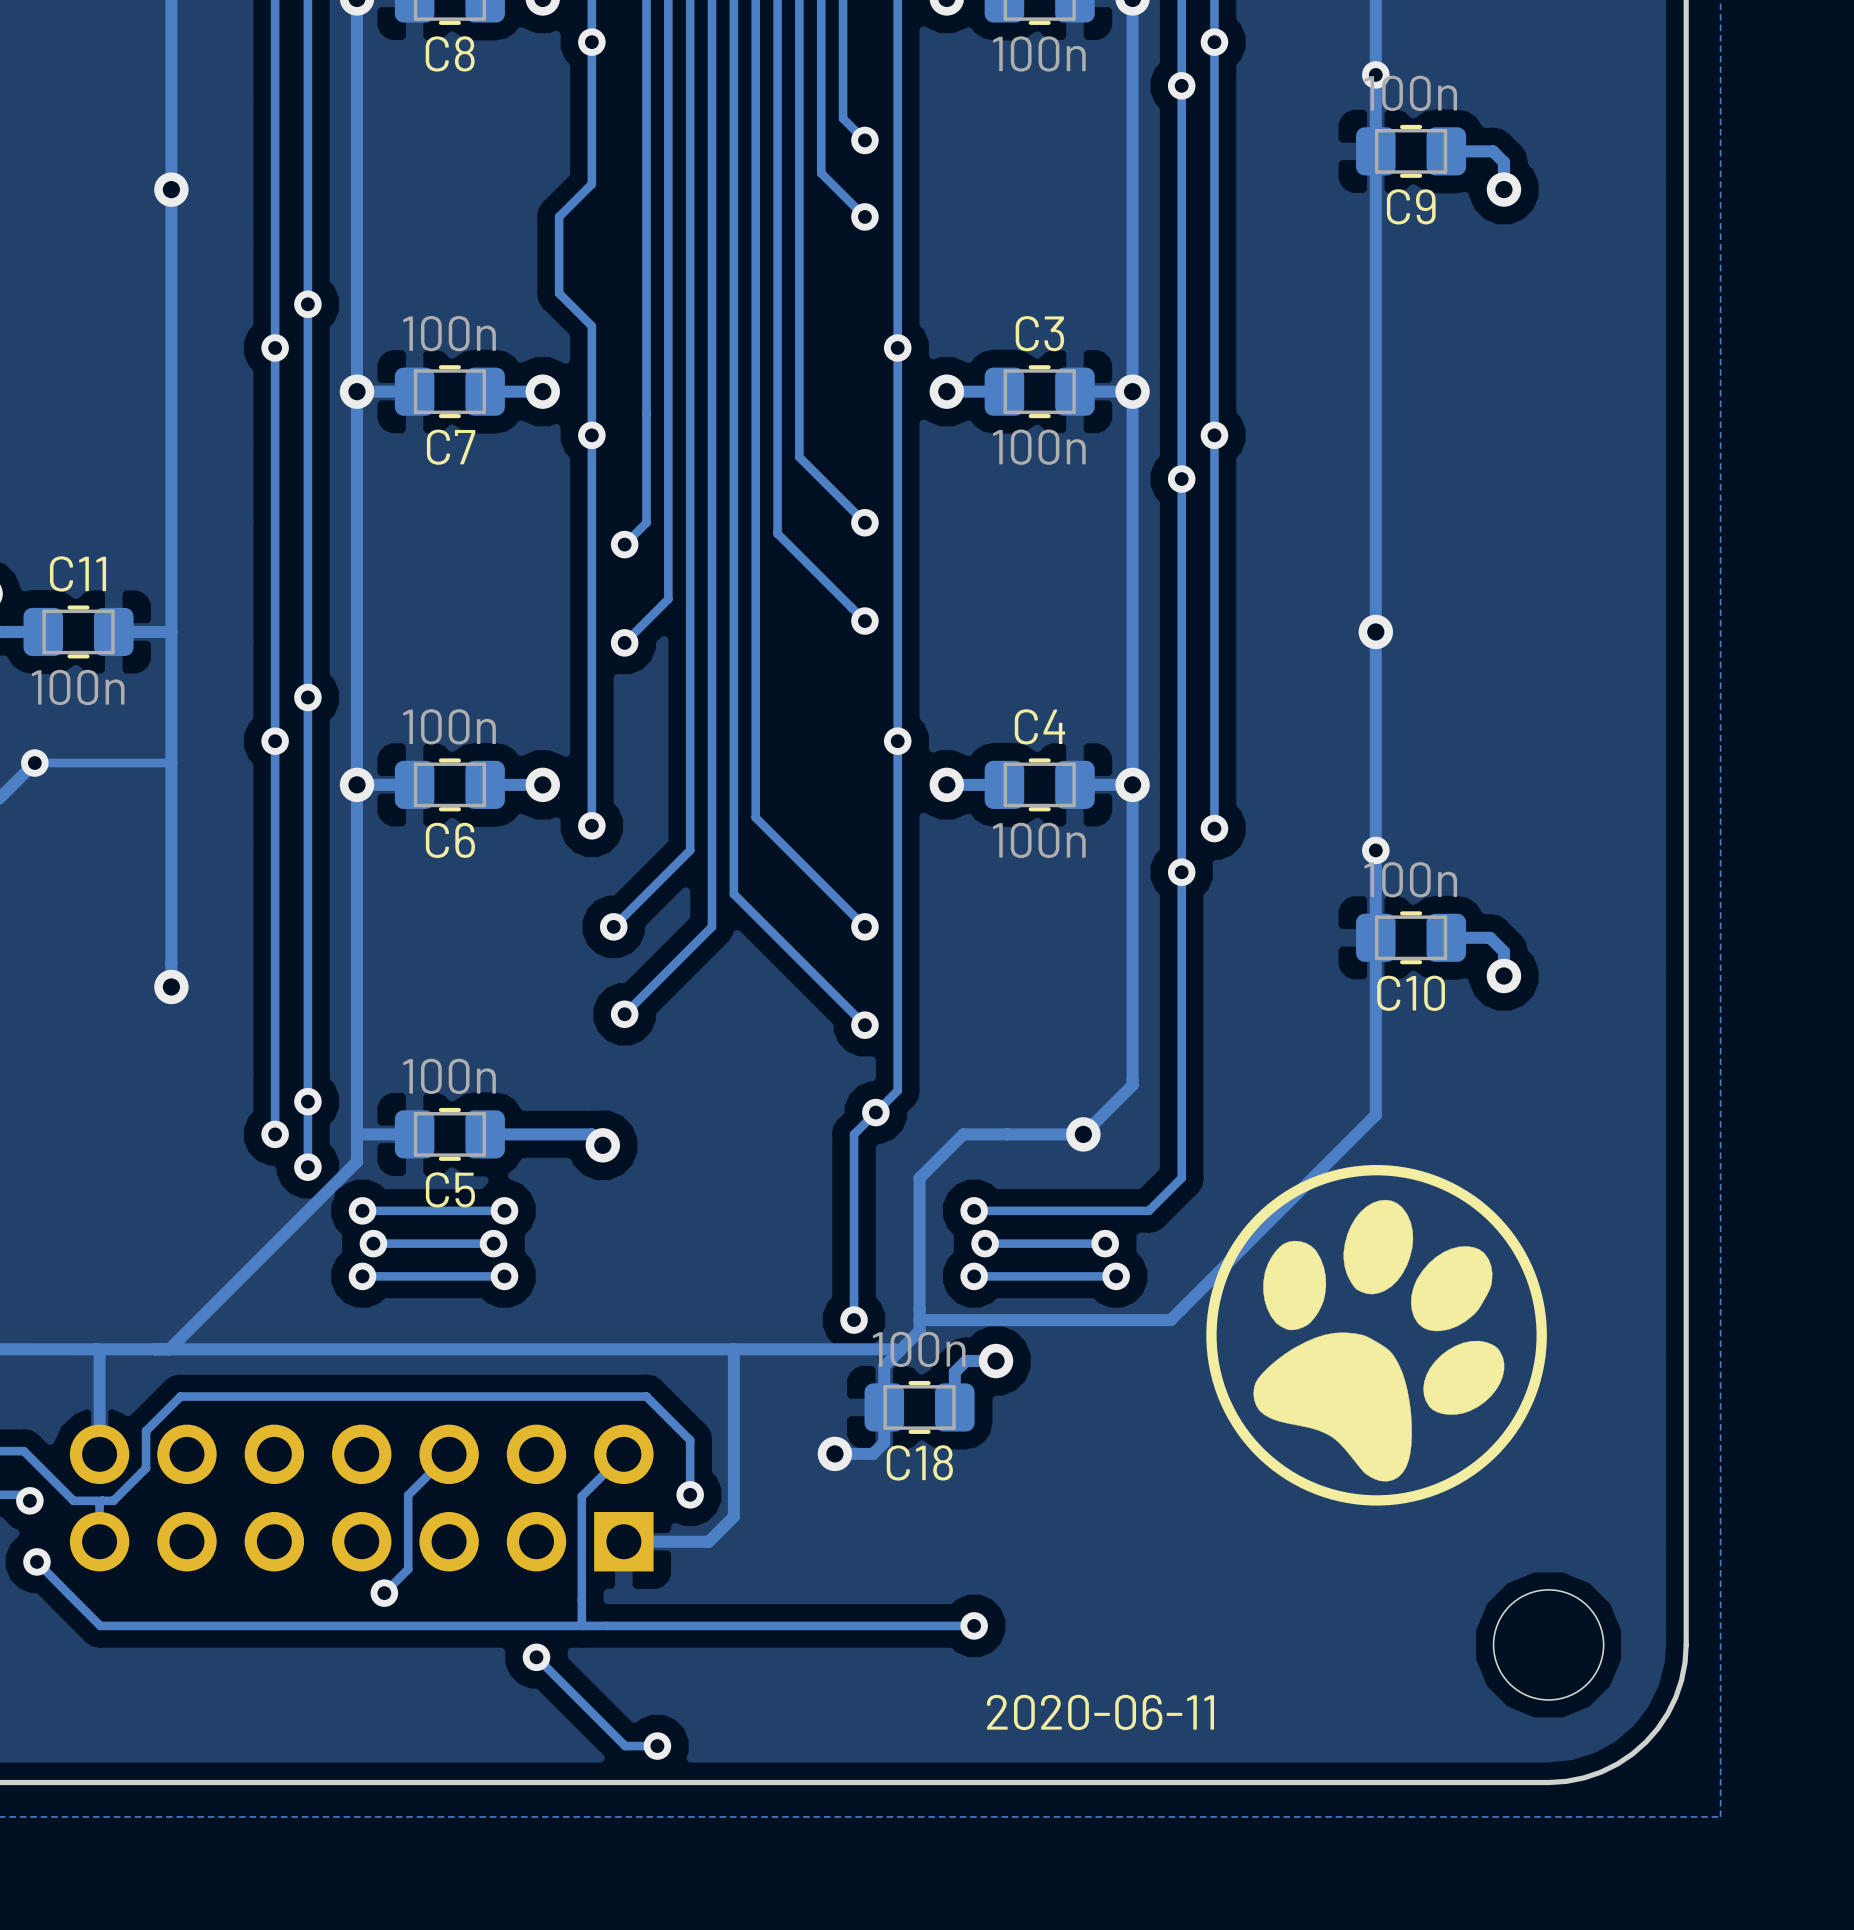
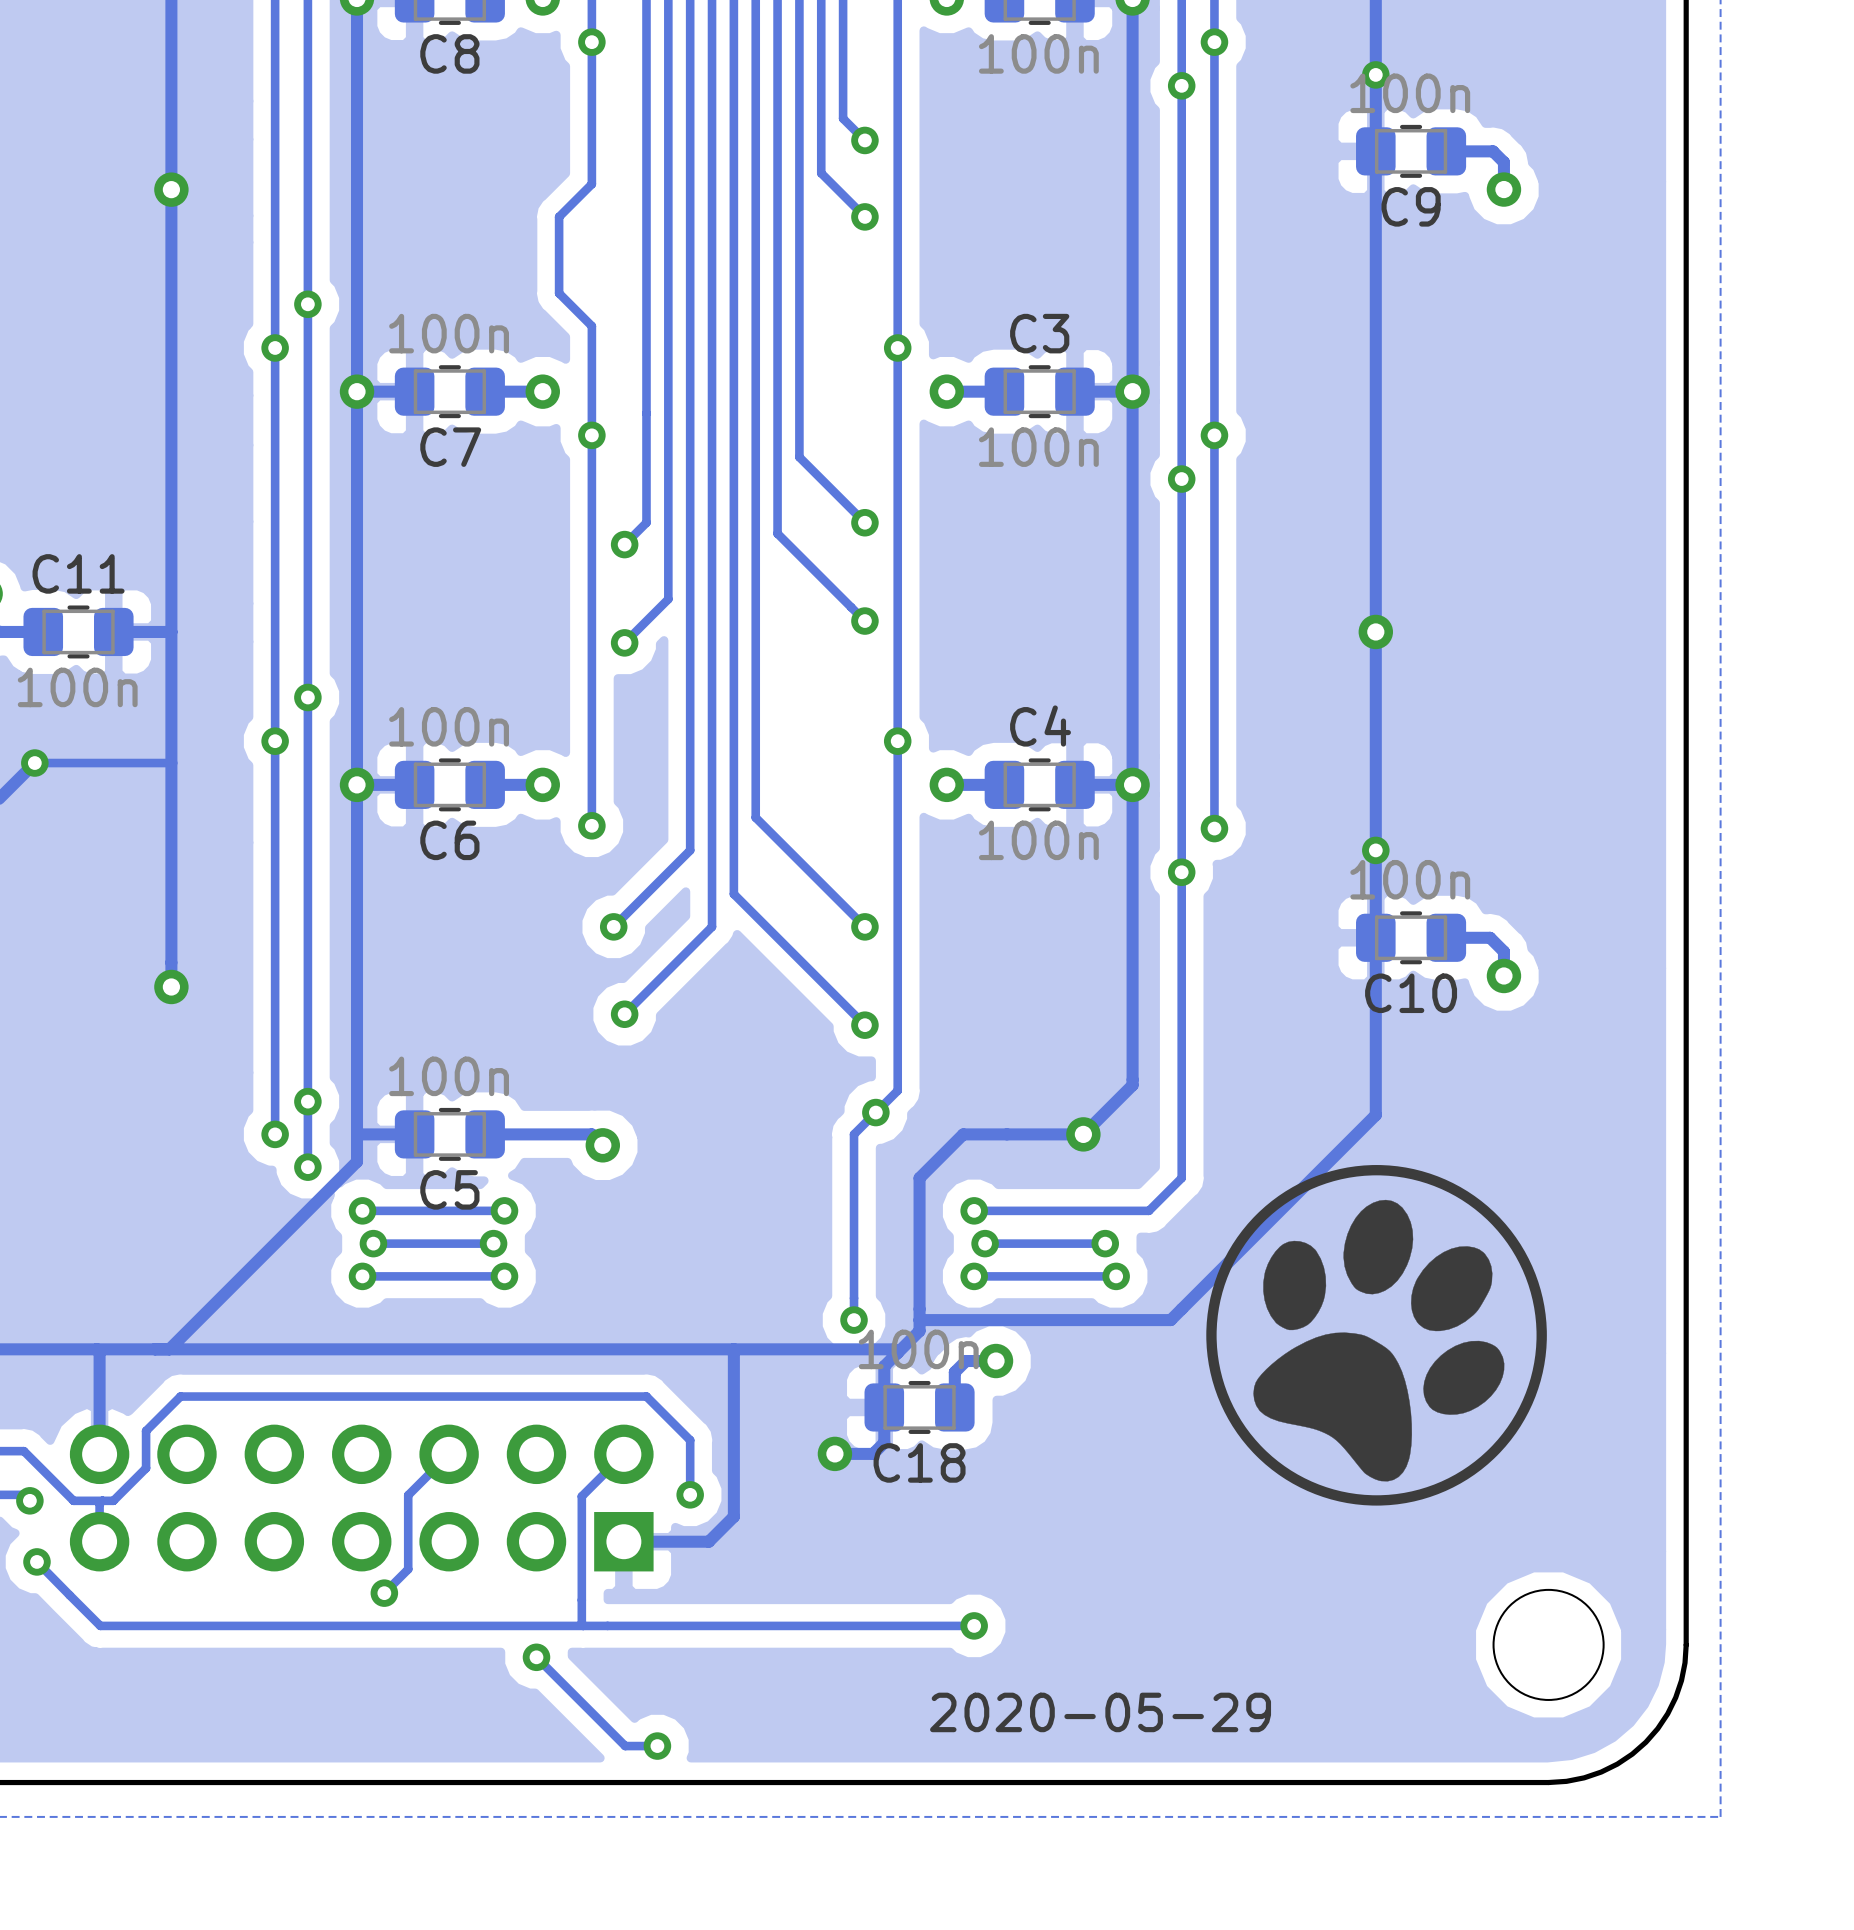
text: 2020-06-11 (1100, 1712) -> 2020-05-29 (1100, 1712)

